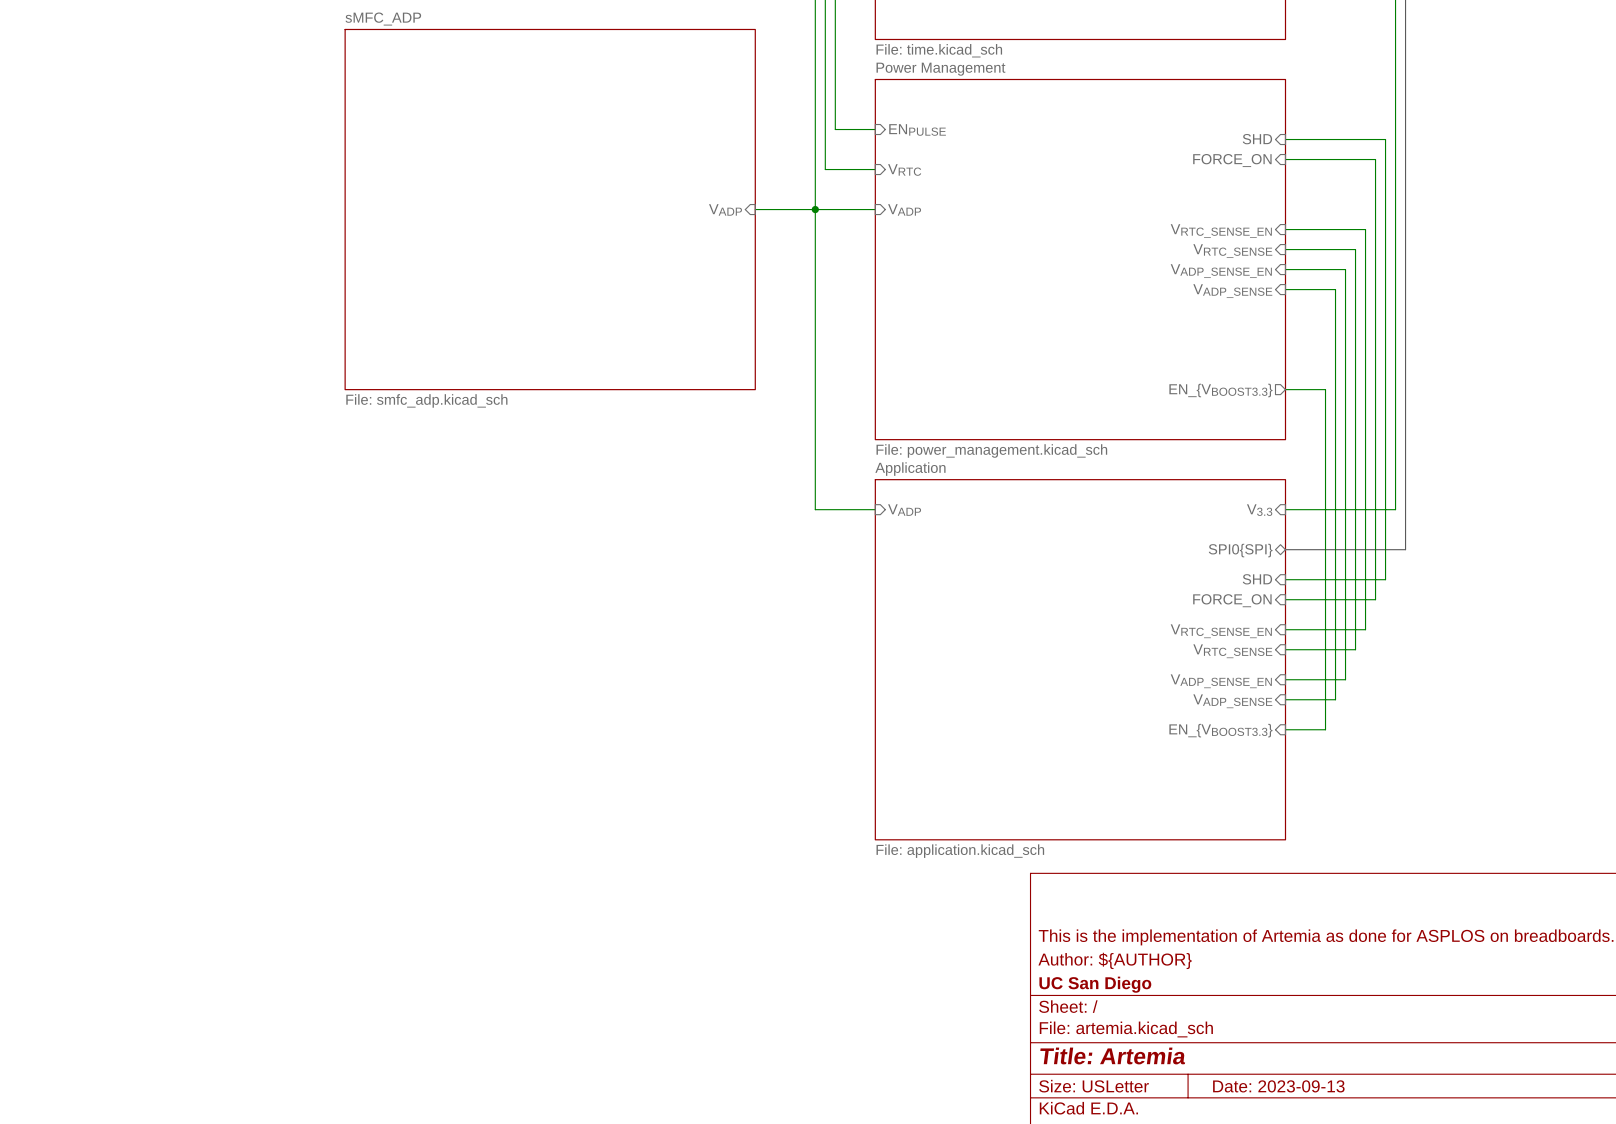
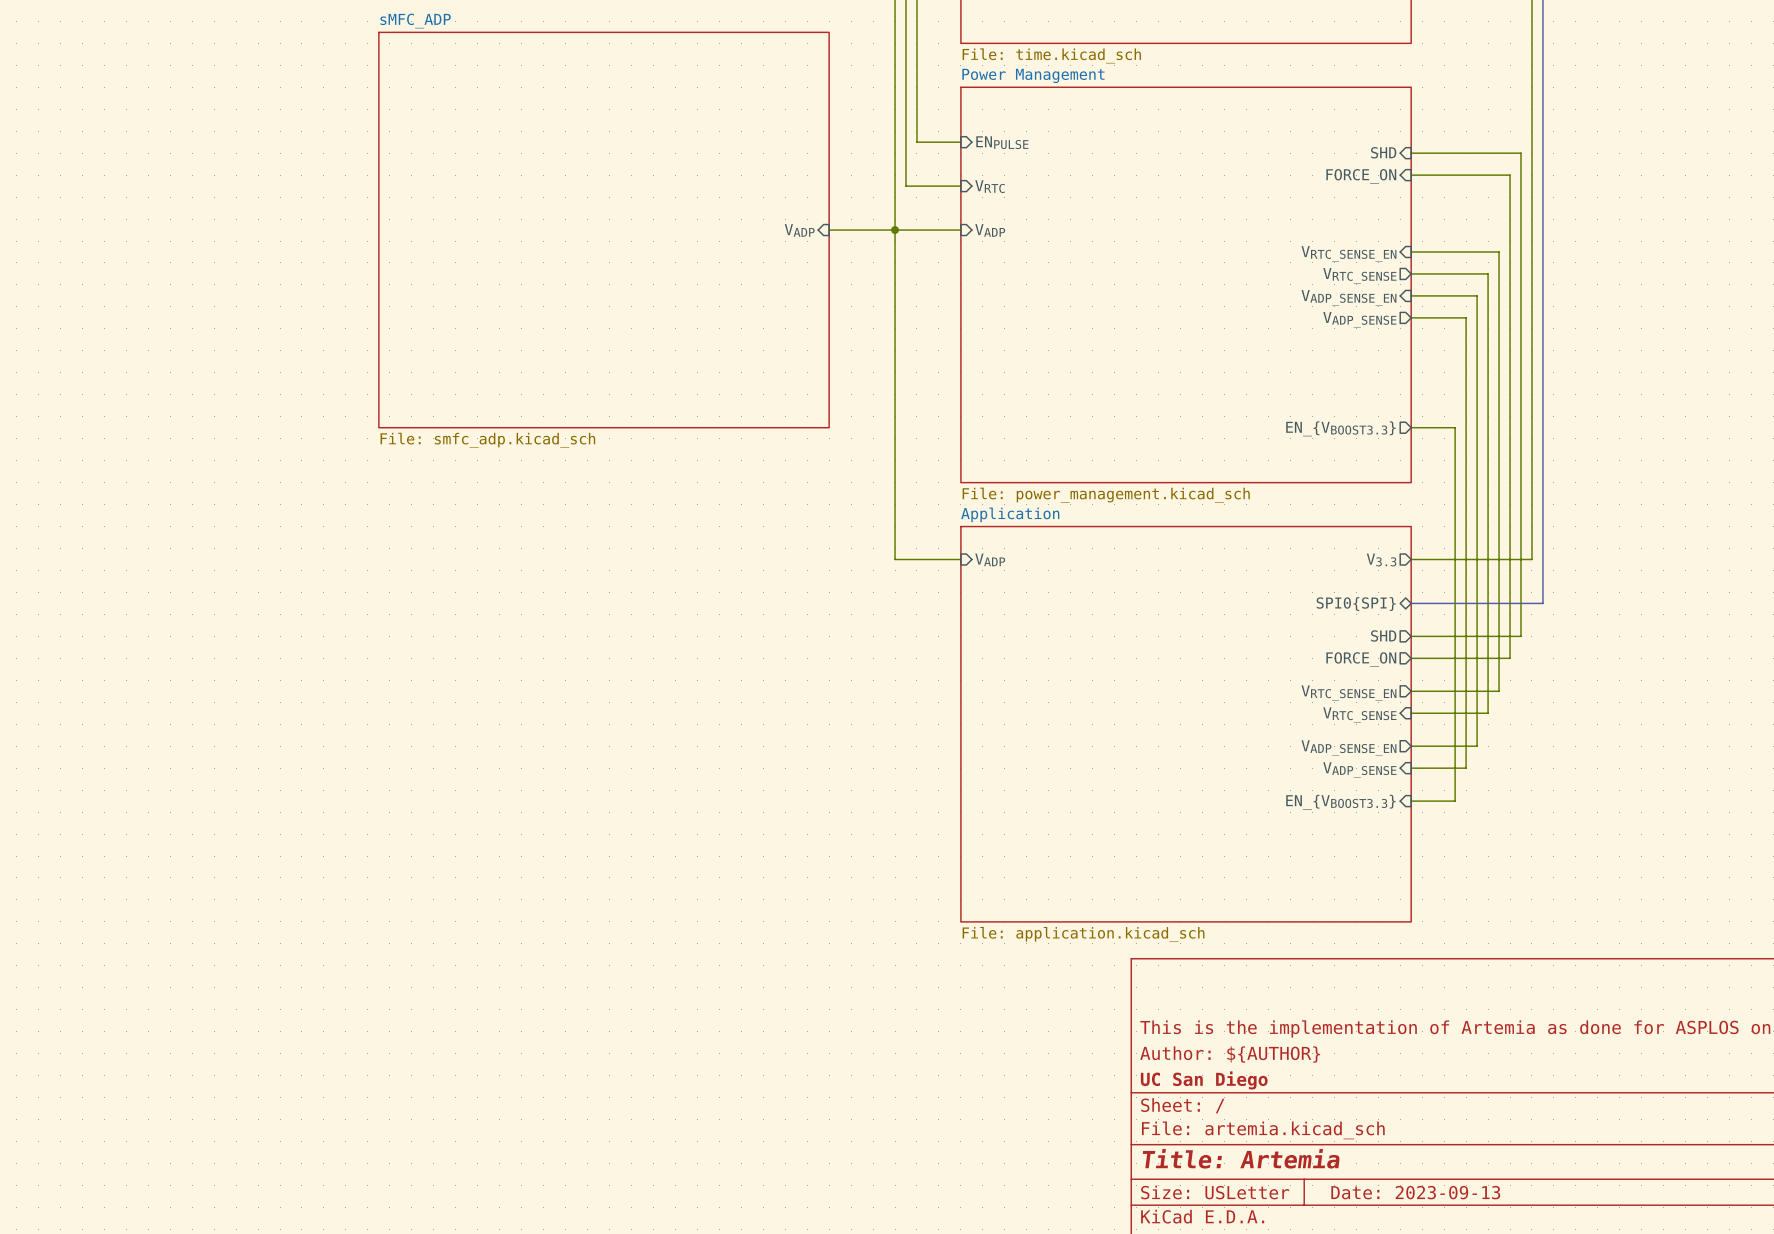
sheet pin shape: input (1232, 251) -> output (1359, 275)
sheet pin shape: input (1232, 291) -> output (1359, 319)
sheet pin shape: input (1259, 510) -> output (1381, 560)
sheet pin shape: input (1257, 579) -> output (1383, 635)
sheet pin shape: input (1232, 600) -> output (1361, 659)
sheet pin shape: input (1221, 631) -> output (1348, 693)
sheet pin shape: input (1221, 681) -> output (1348, 748)

